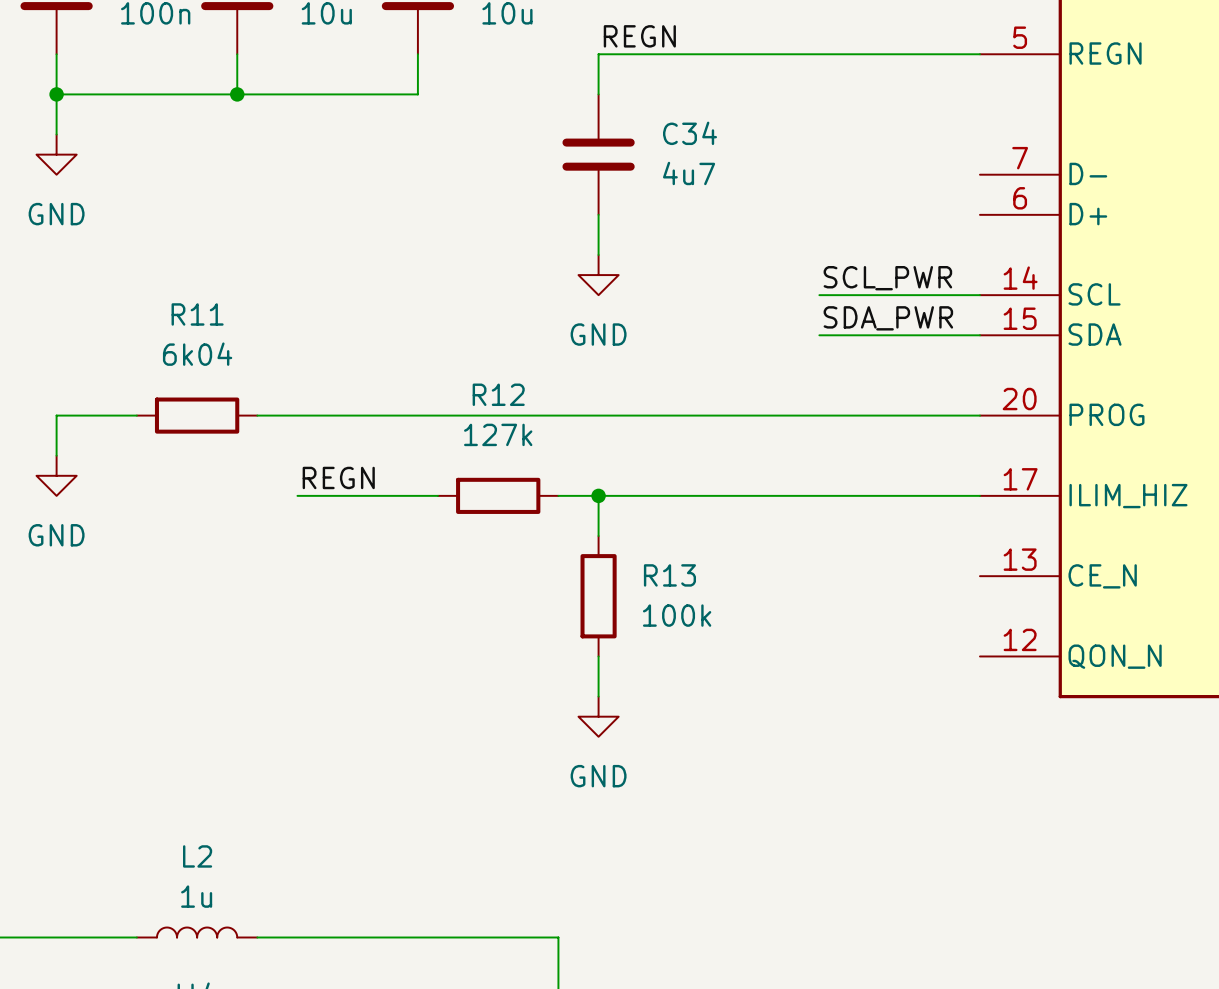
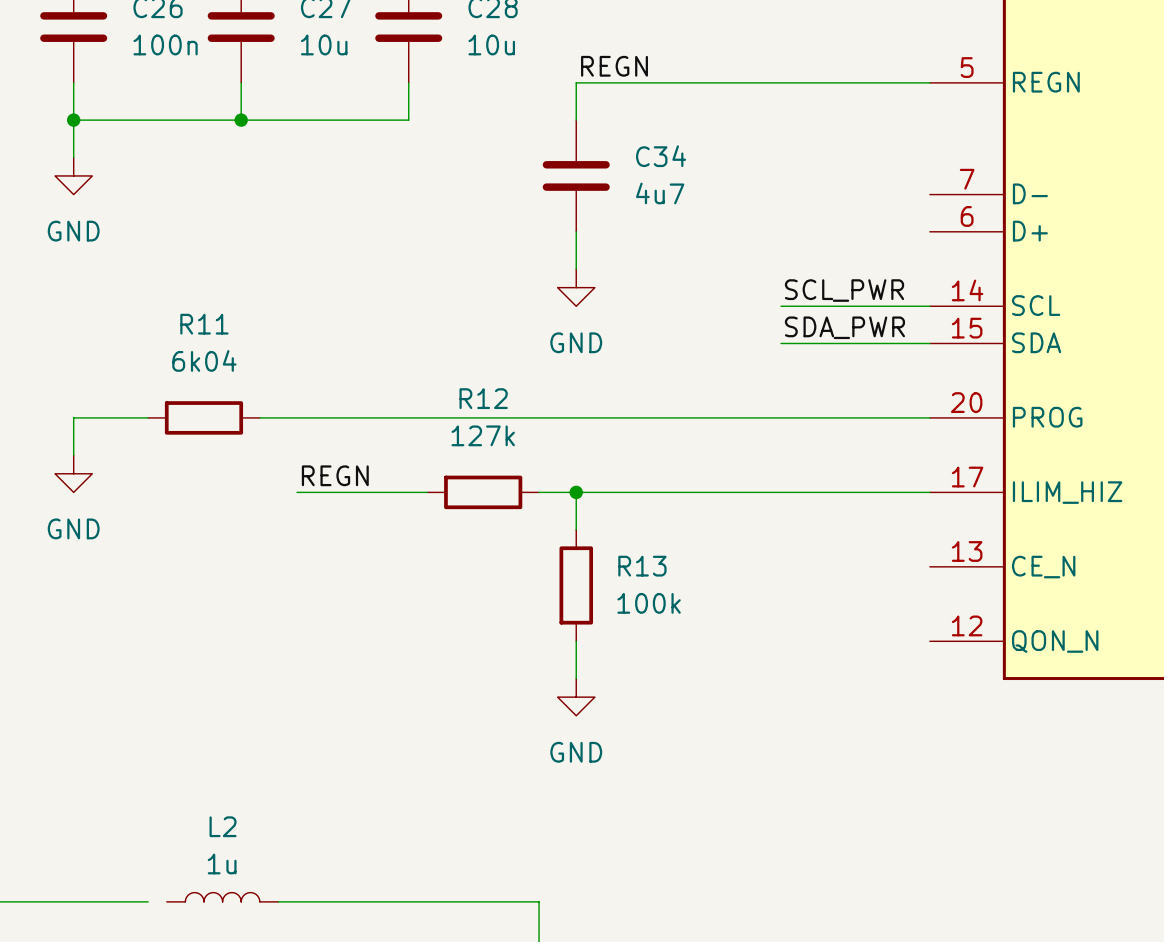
L2 position: (197, 932) -> (222, 897)

